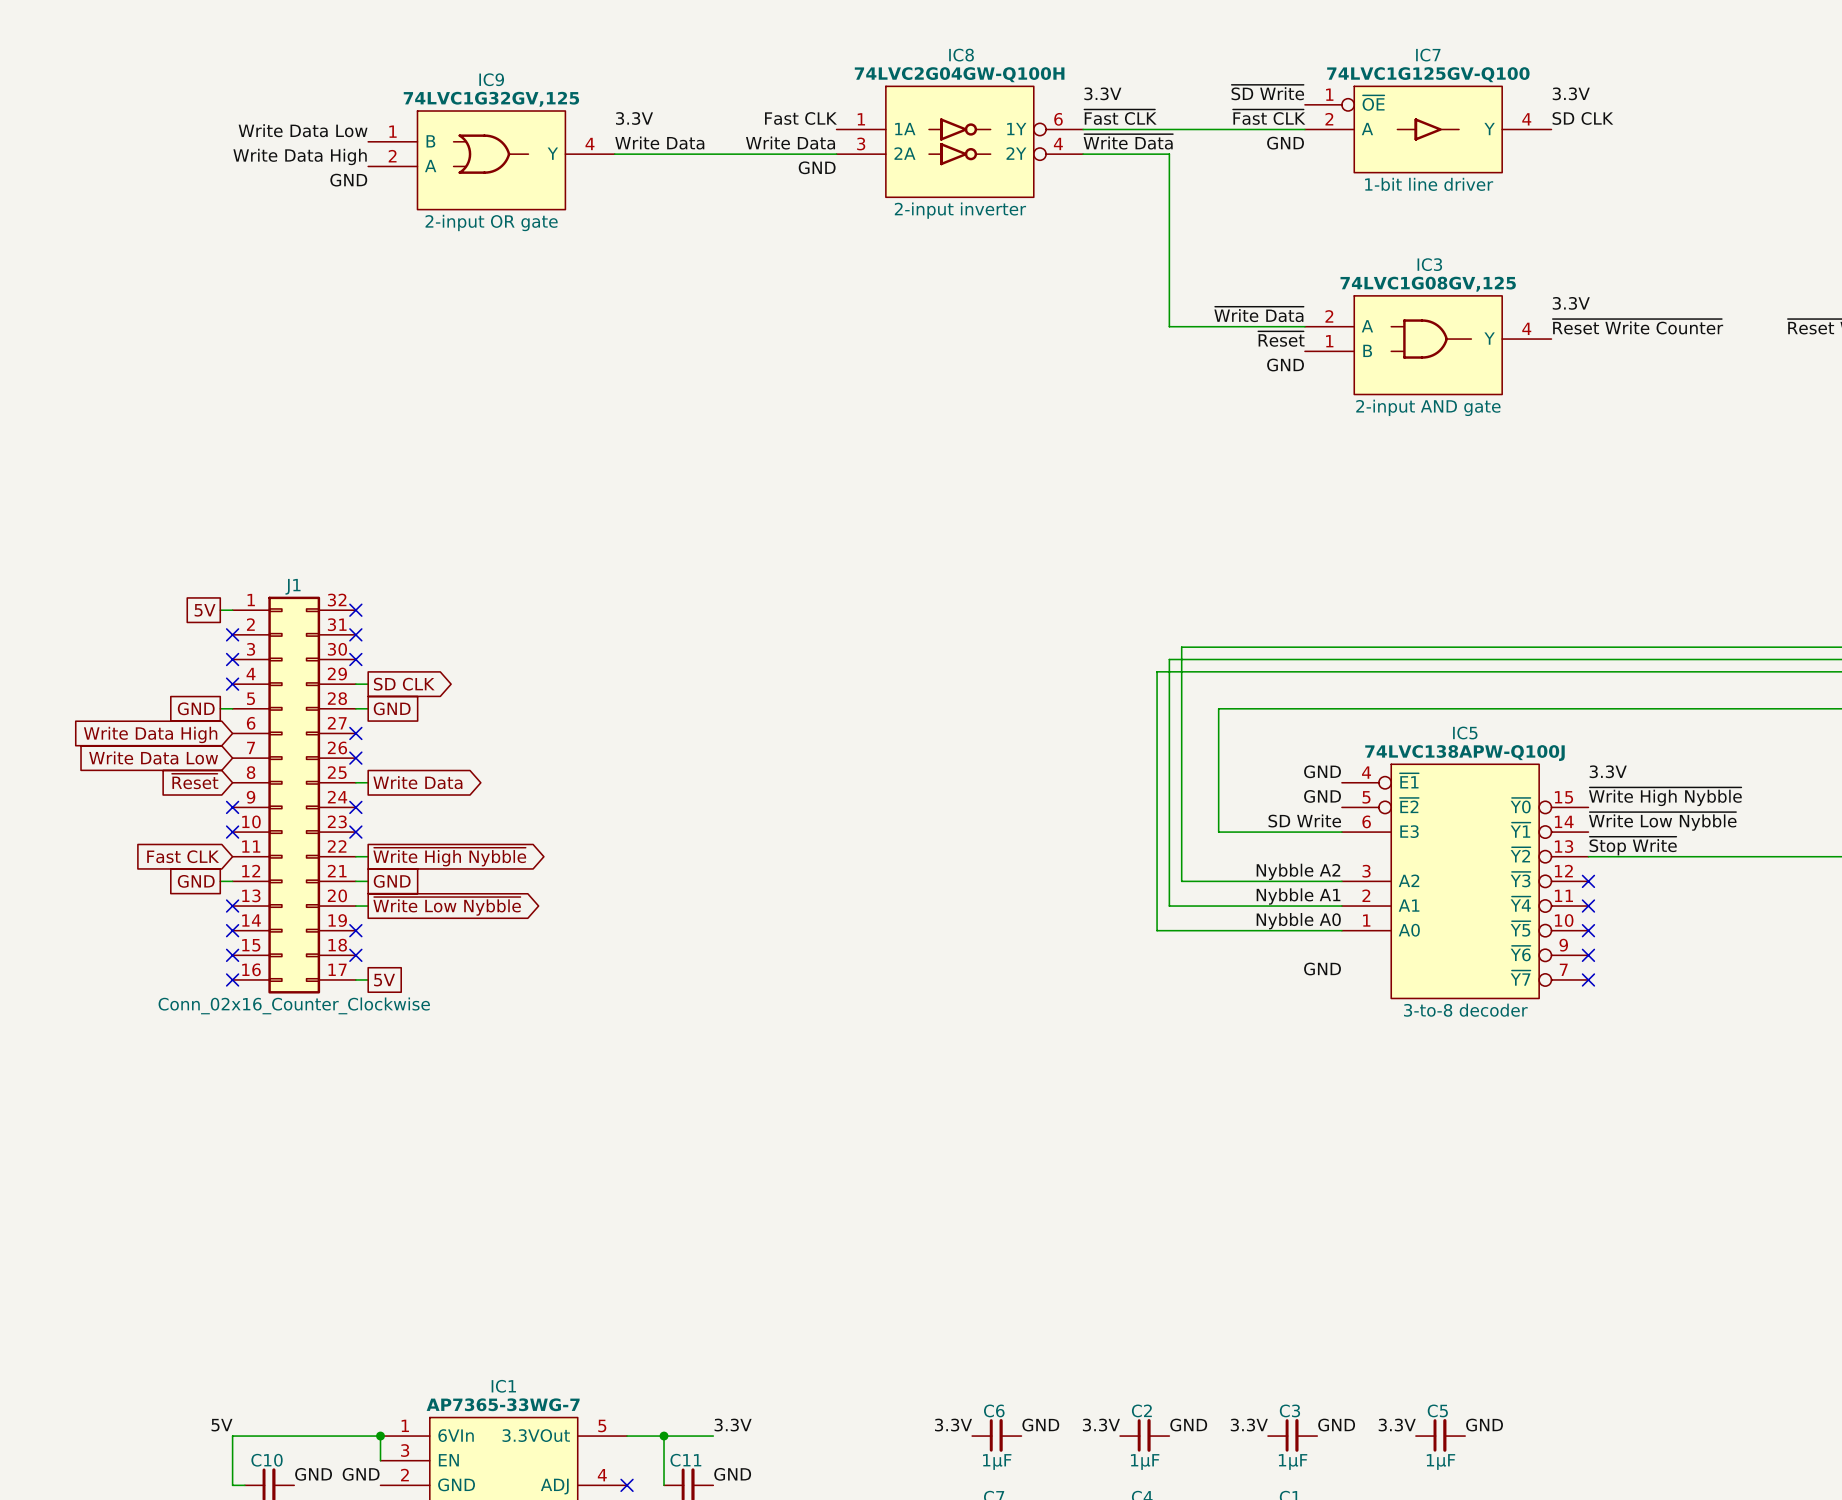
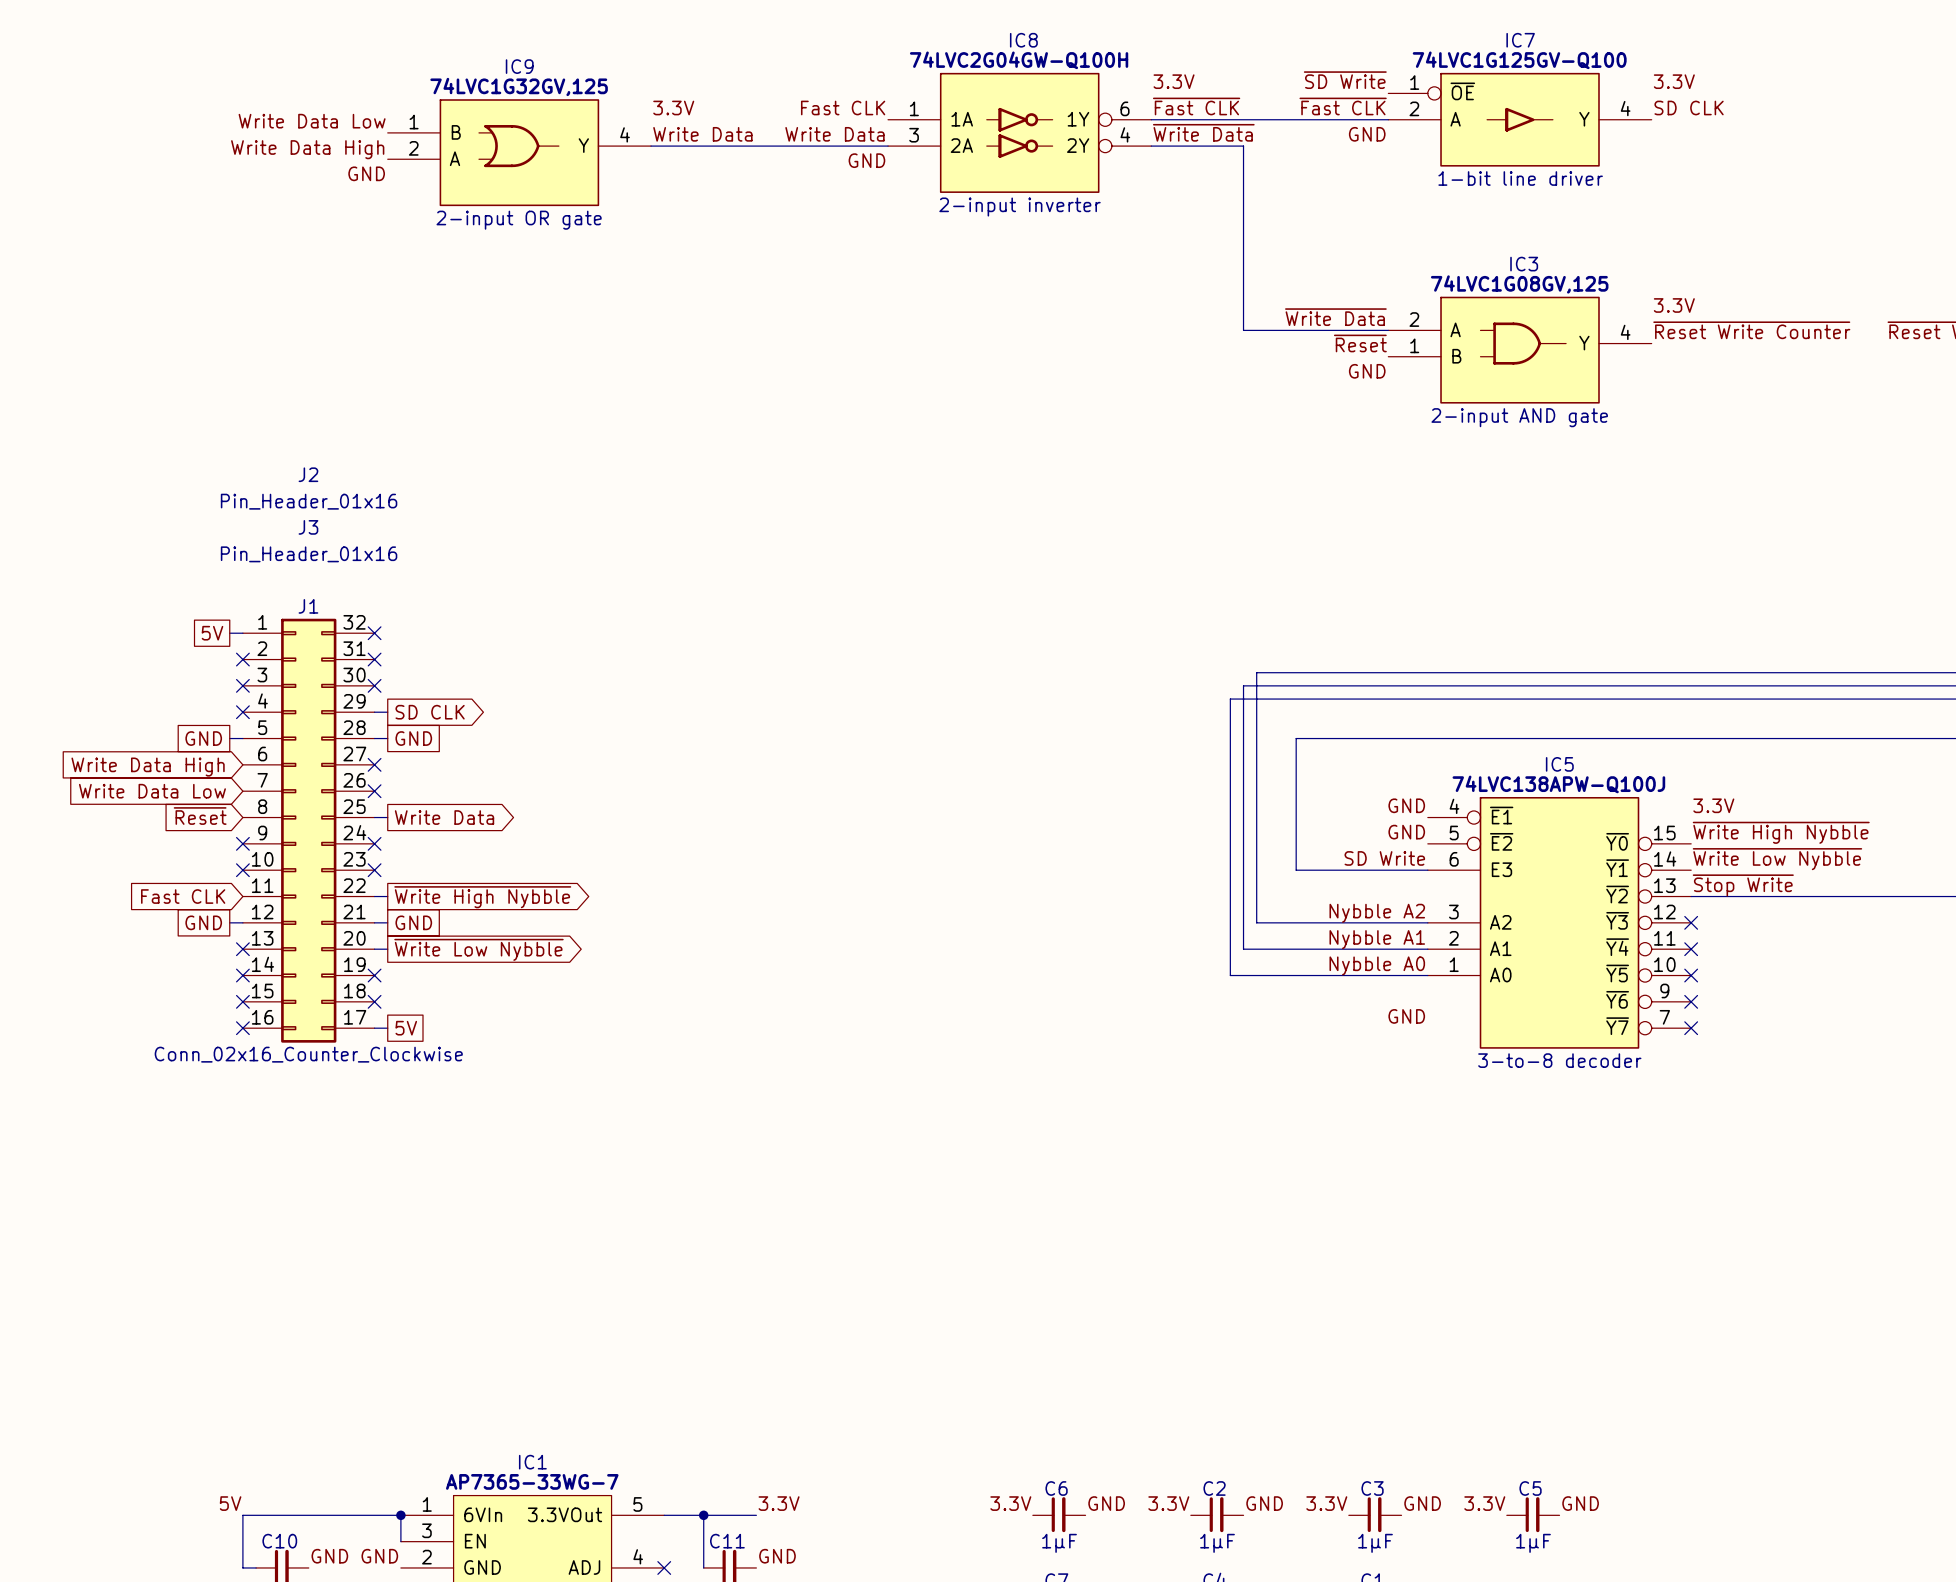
J2: none -> Pin_Header_01x16 (309, 488)
J3: none -> Pin_Header_01x16 (309, 541)

